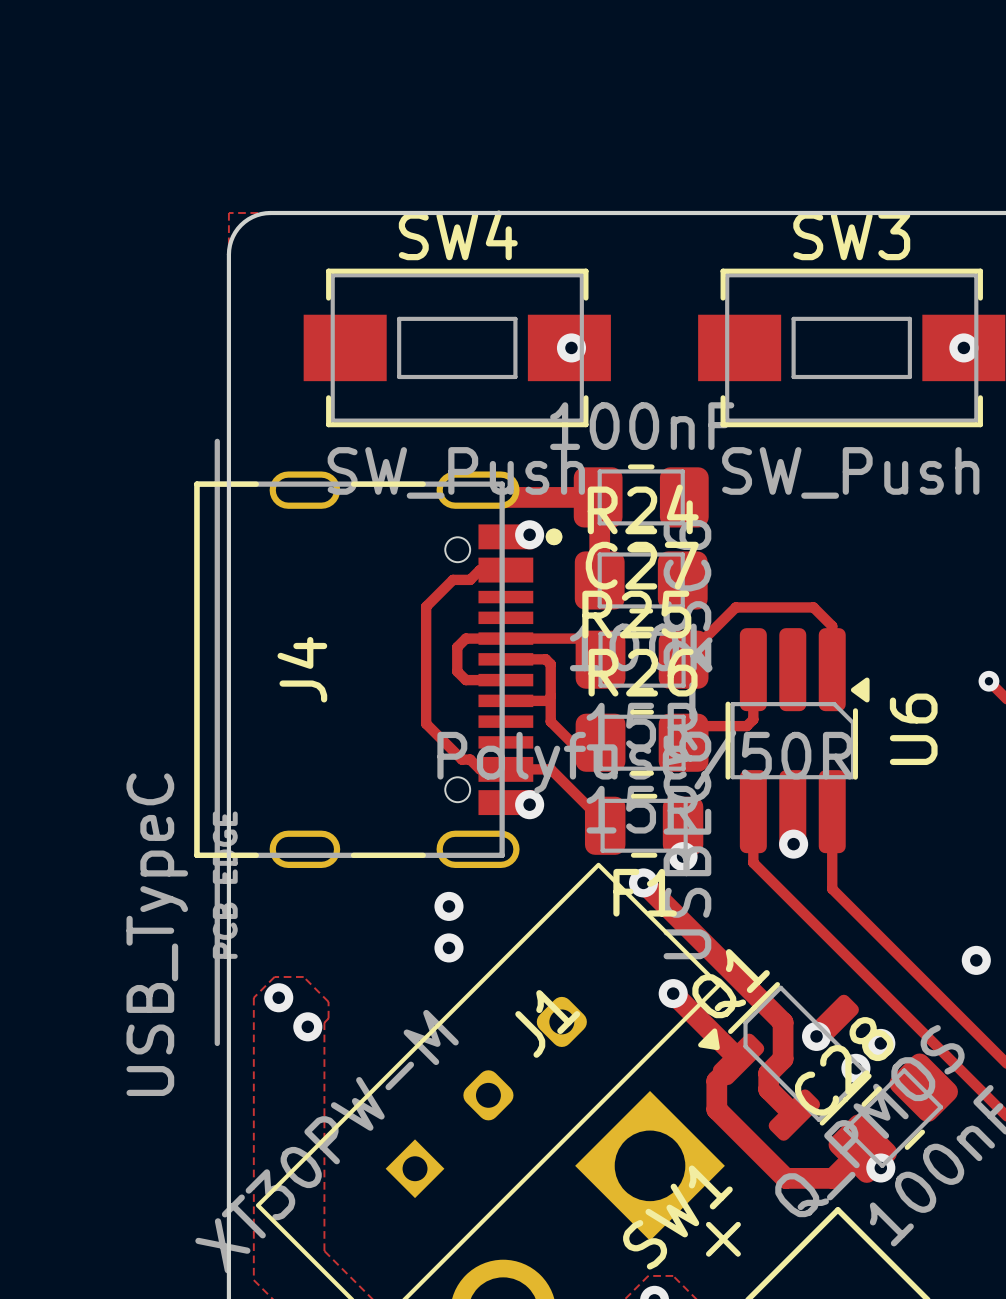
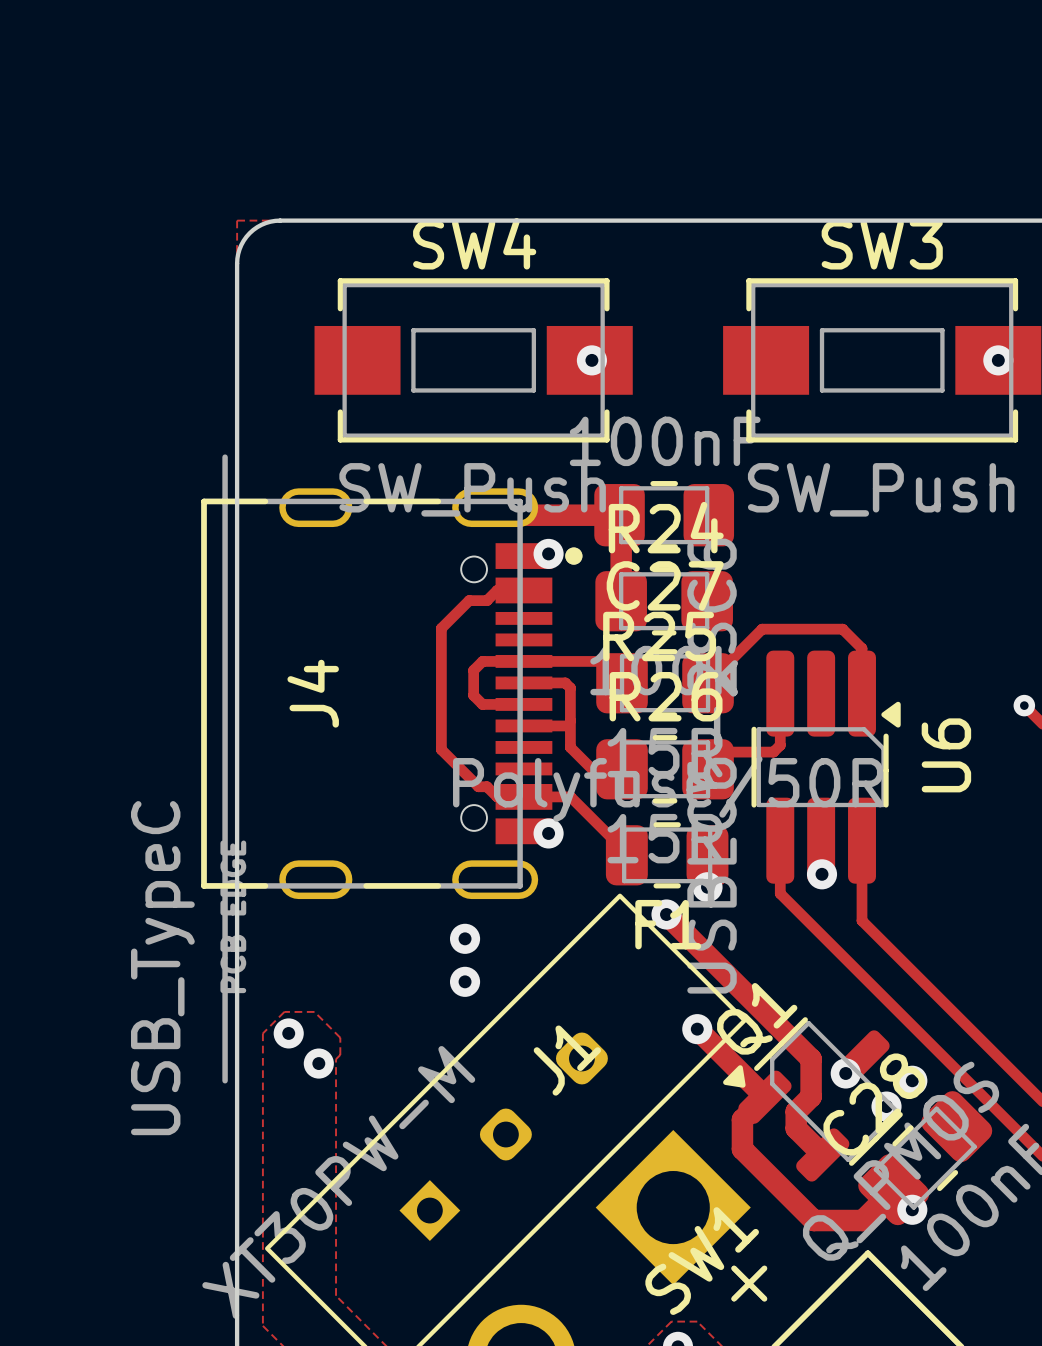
via: (976, 960) -> none

